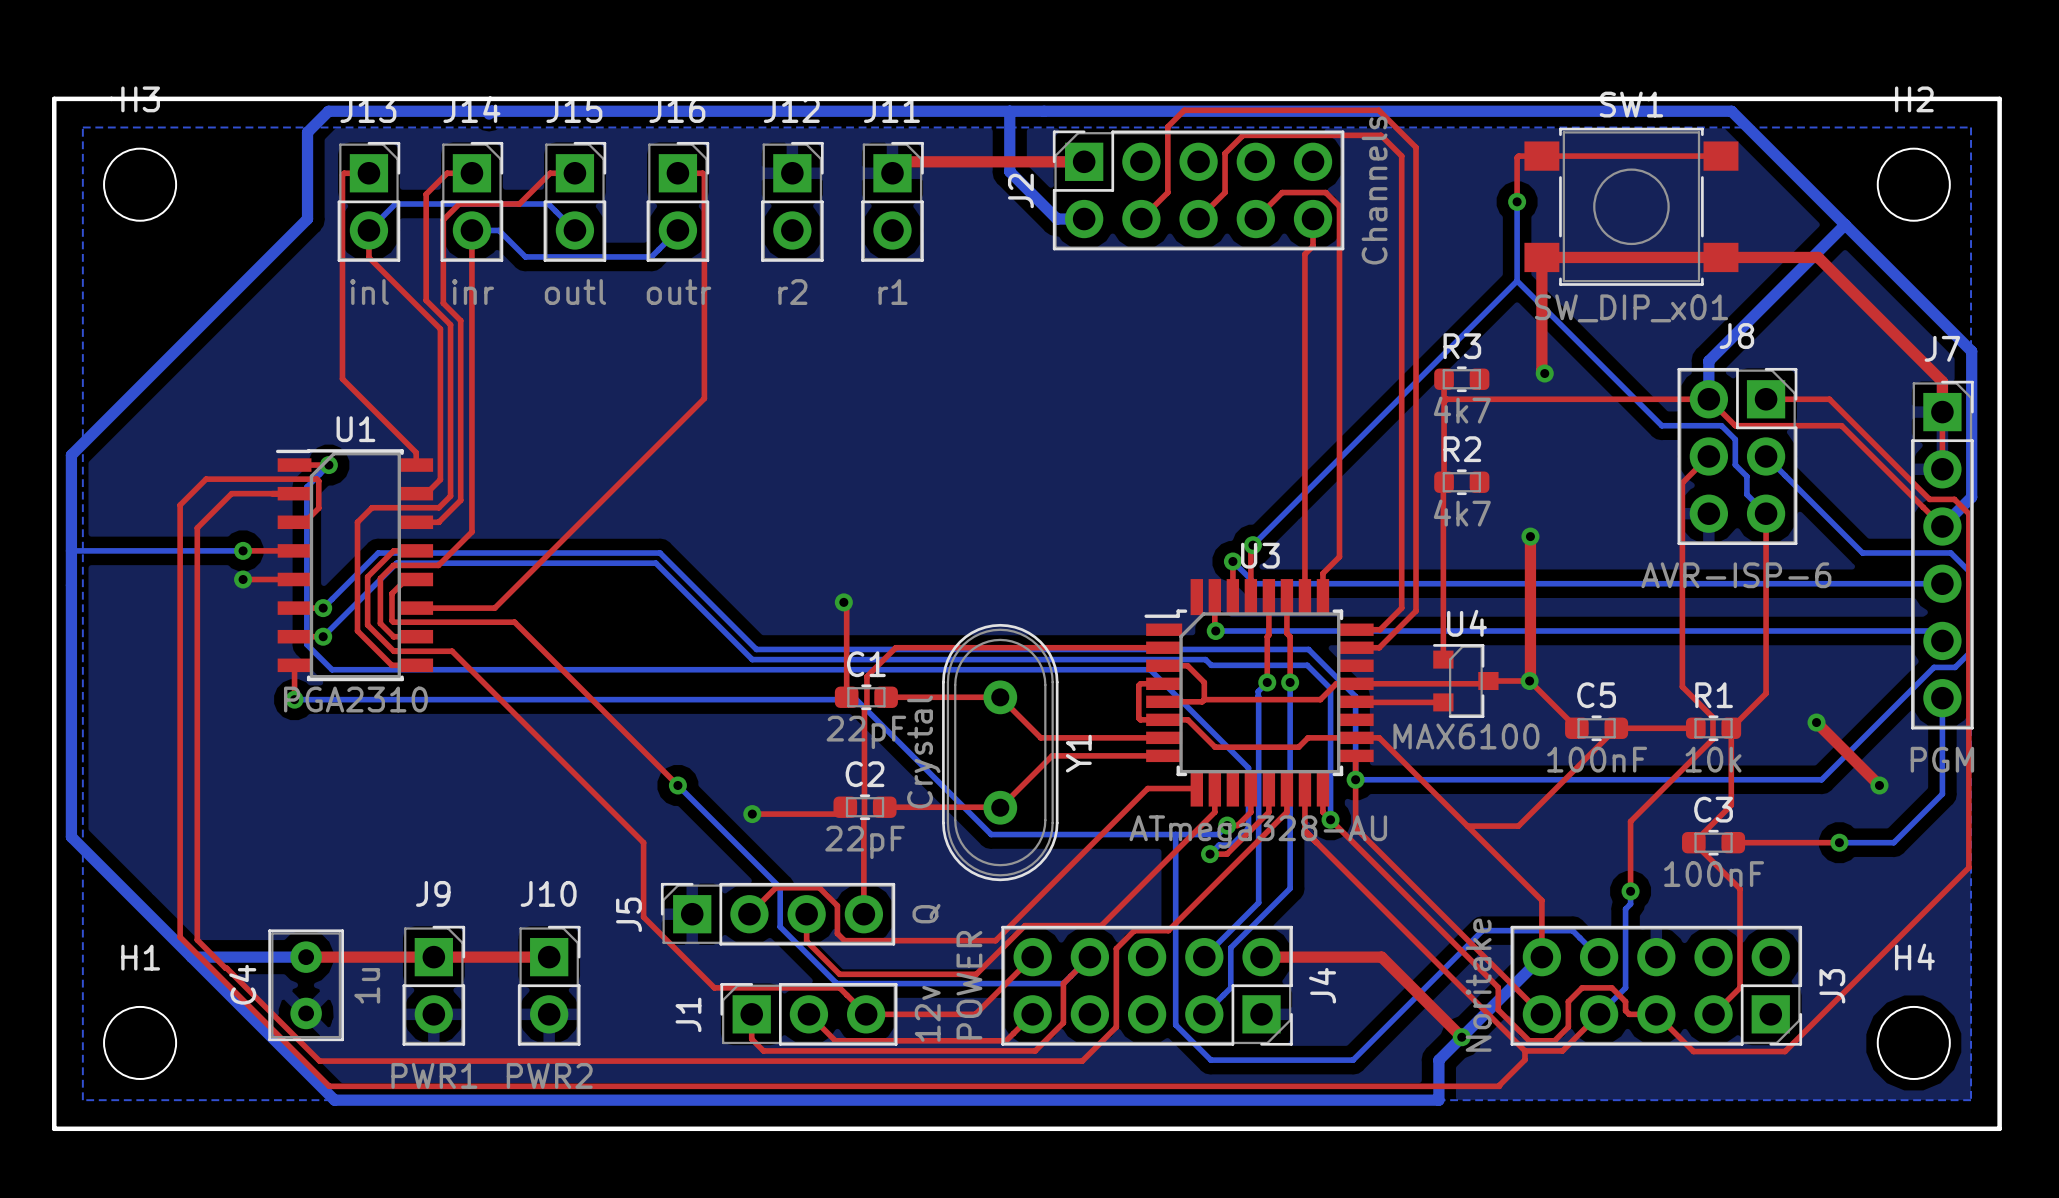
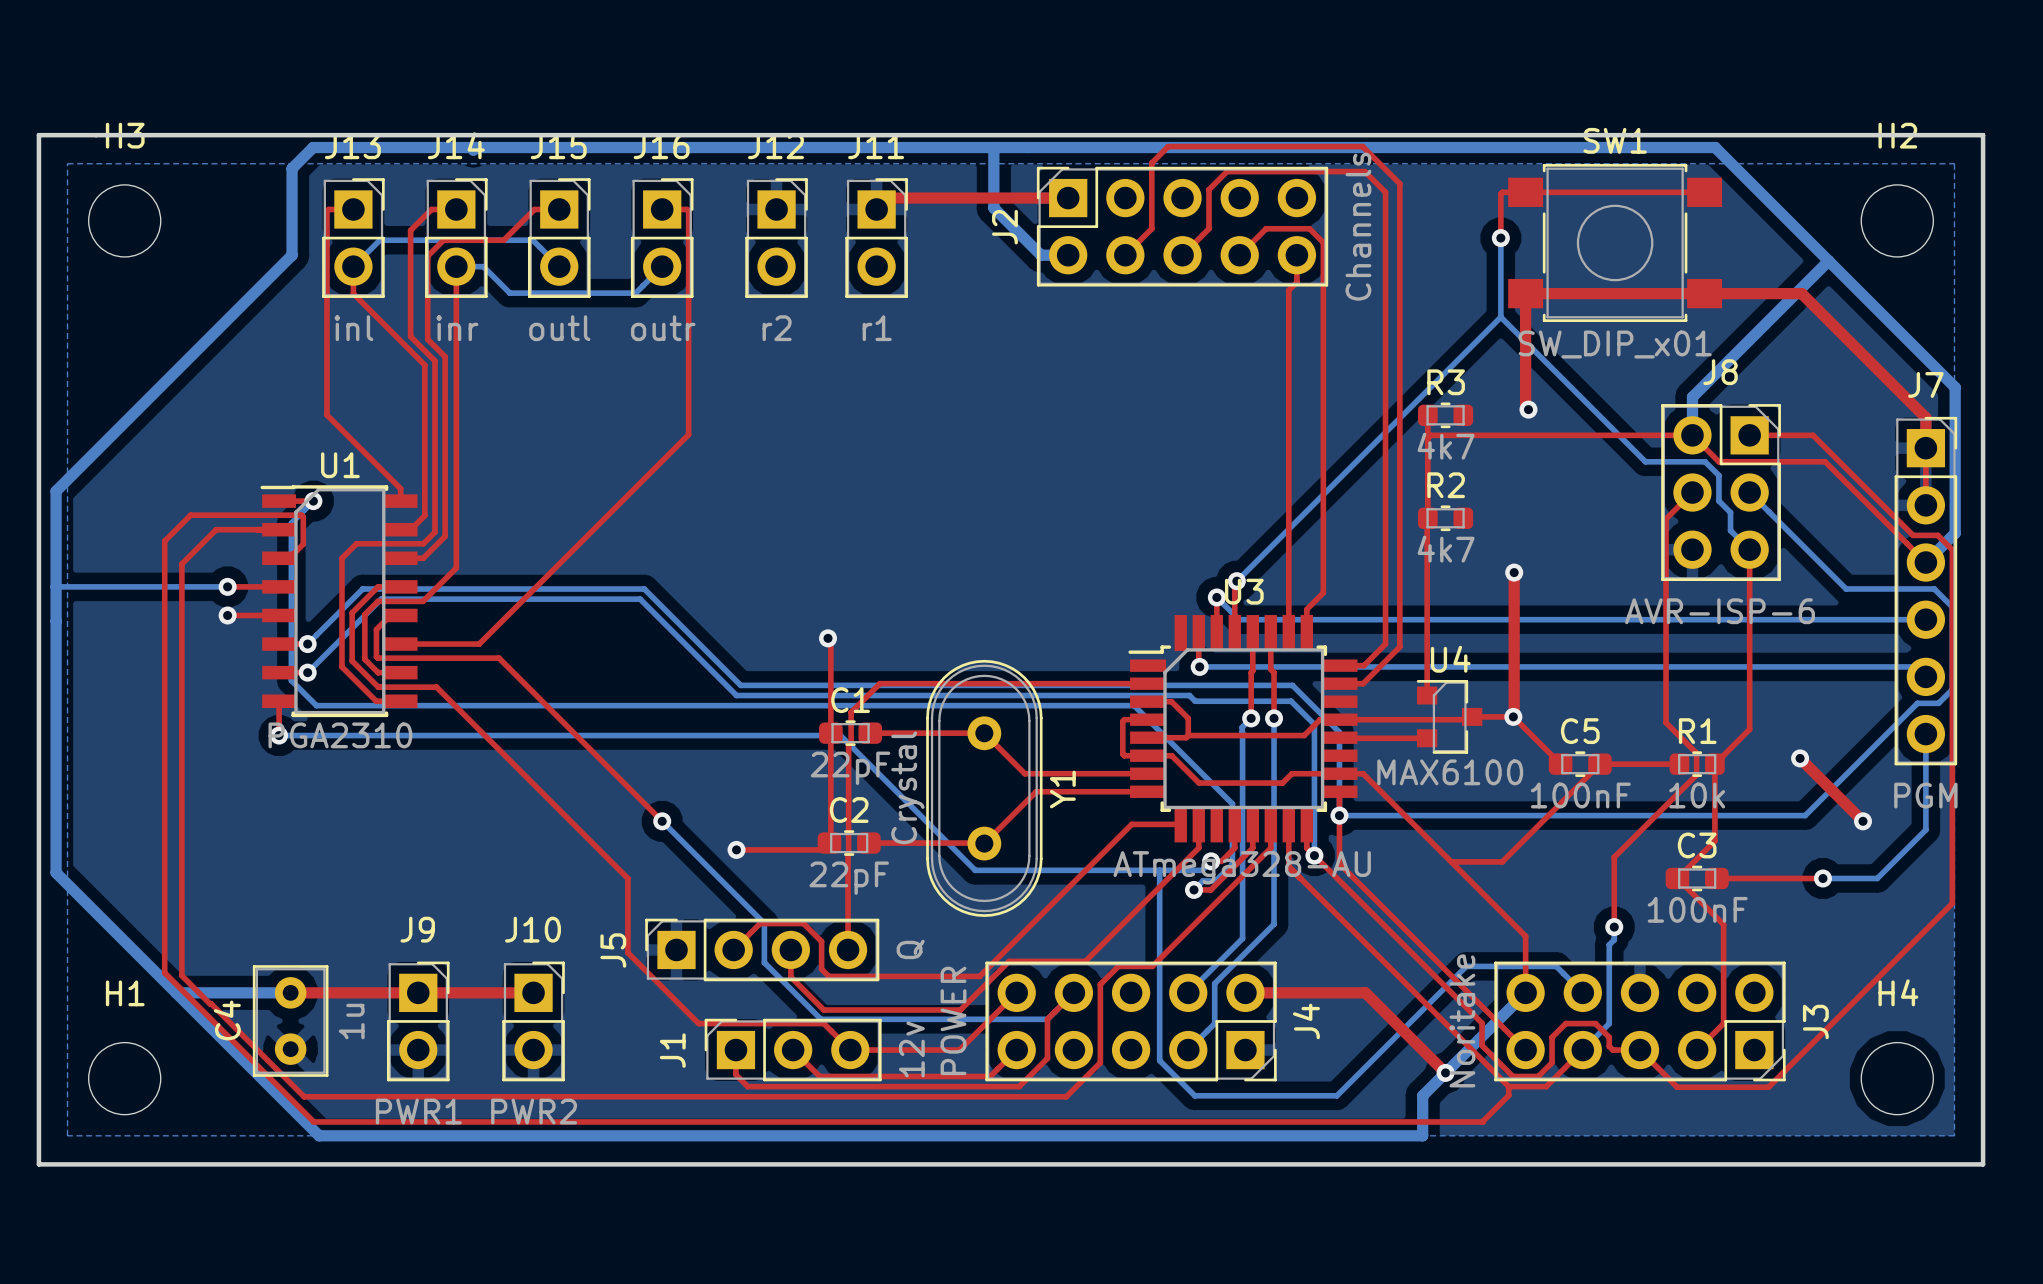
top track: none -> (830, 733) (829, 843)

